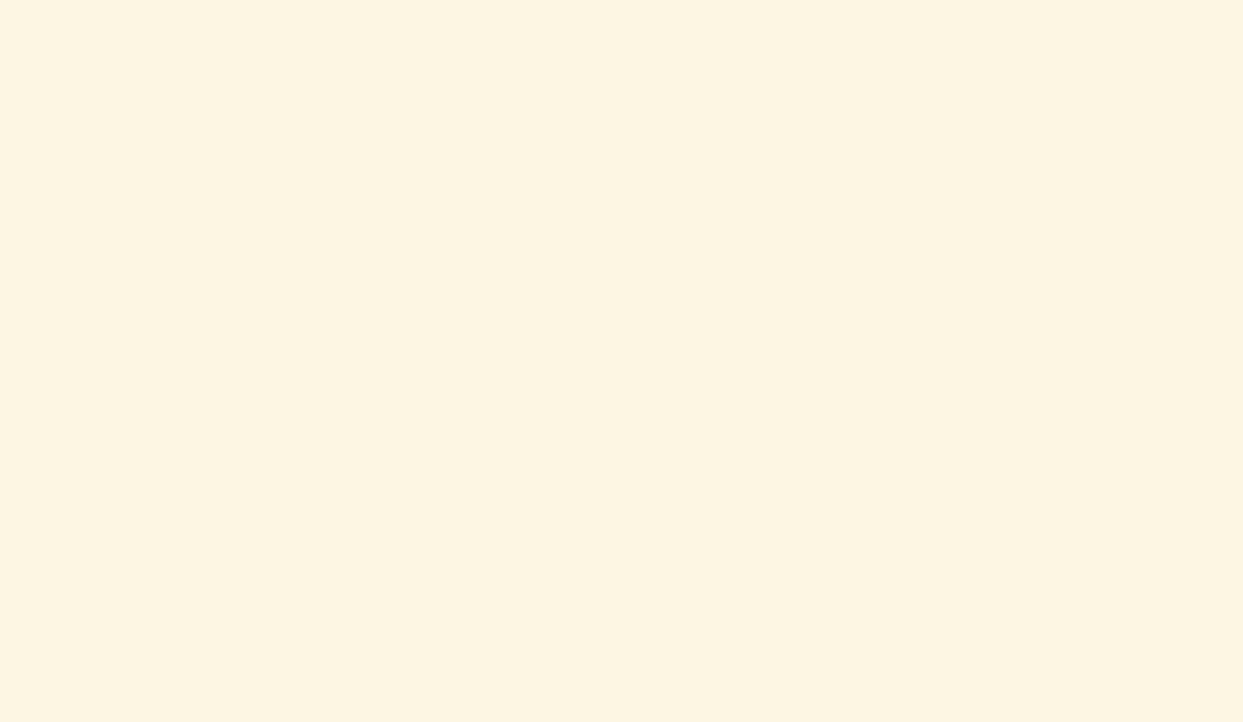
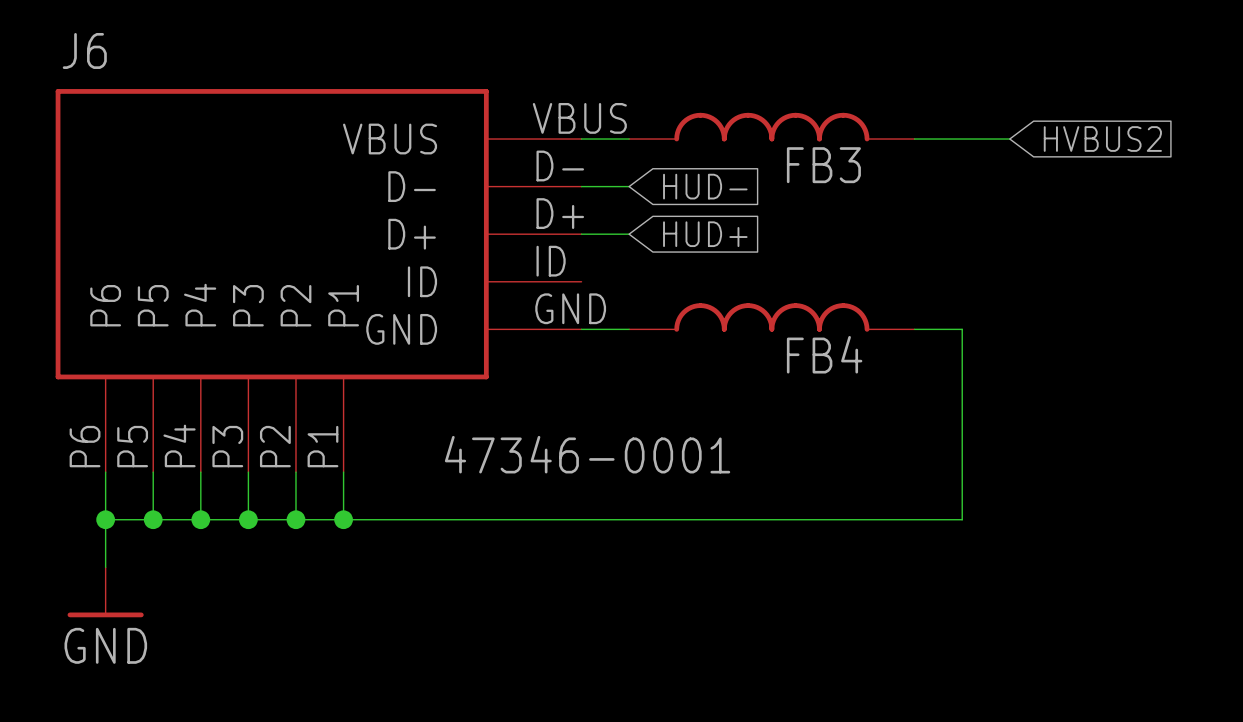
FB3: none -> (771, 127)
wire: none -> (581, 139) (629, 139)
wire: none -> (914, 139) (1009, 139)
global label: none -> HVBUS2 (1102, 139)
wire: none -> (581, 186) (629, 186)
global label: none -> HUD- (705, 186)
wire: none -> (581, 234) (629, 234)
global label: none -> HUD+ (705, 234)
J6: none -> 47346-0001 (318, 280)
FB4: none -> (771, 317)
wire: none -> (581, 329) (629, 329)
wire: none -> (914, 329) (962, 329) (962, 519) (105, 519)
wire: none -> (105, 472) (105, 567)
wire: none -> (153, 472) (153, 519)
wire: none -> (200, 472) (200, 519)
wire: none -> (248, 472) (248, 519)
wire: none -> (295, 472) (295, 519)
wire: none -> (343, 472) (343, 519)
junction: none -> (105, 519)
junction: none -> (153, 519)
junction: none -> (200, 519)
junction: none -> (248, 519)
junction: none -> (295, 519)
junction: none -> (343, 519)
power symbol: none -> GND (105, 592)

